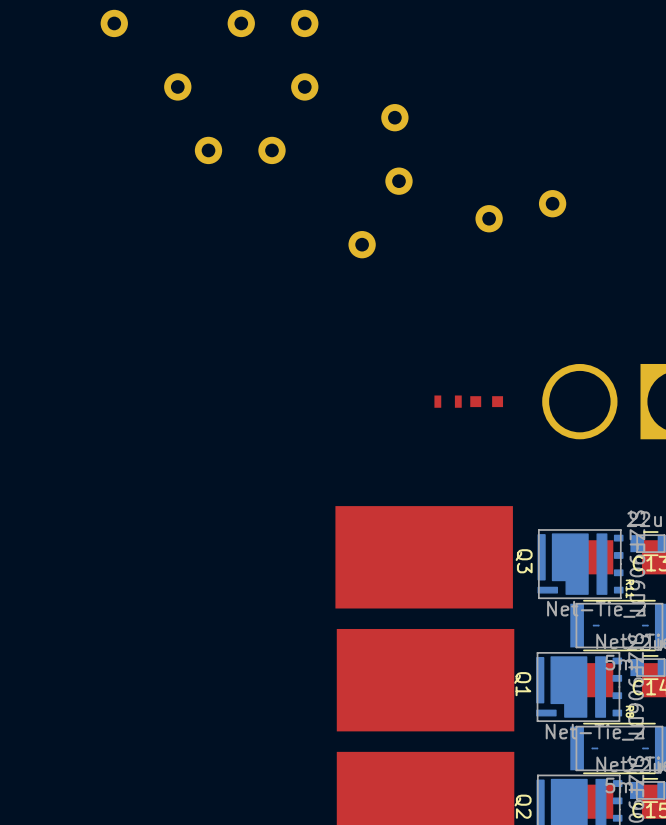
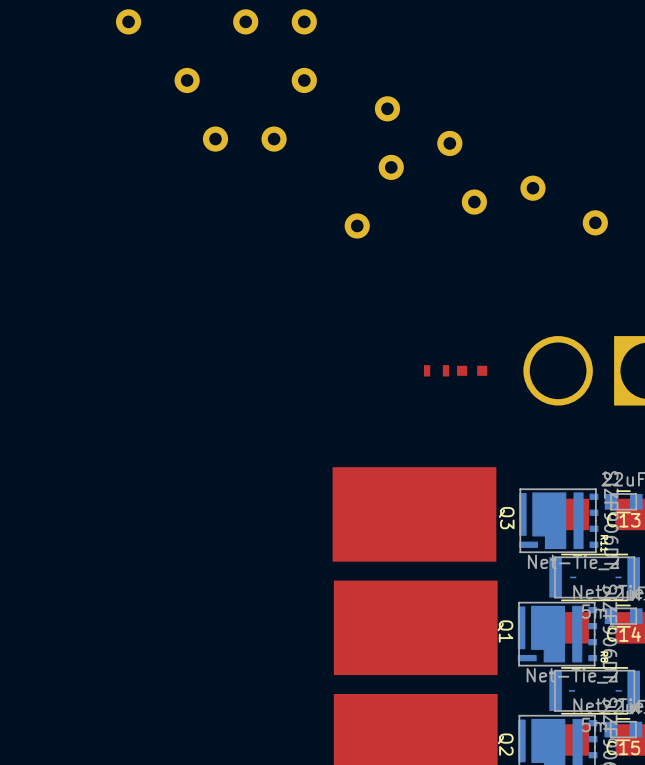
part: none -> (449, 143)
part: none -> (595, 222)

